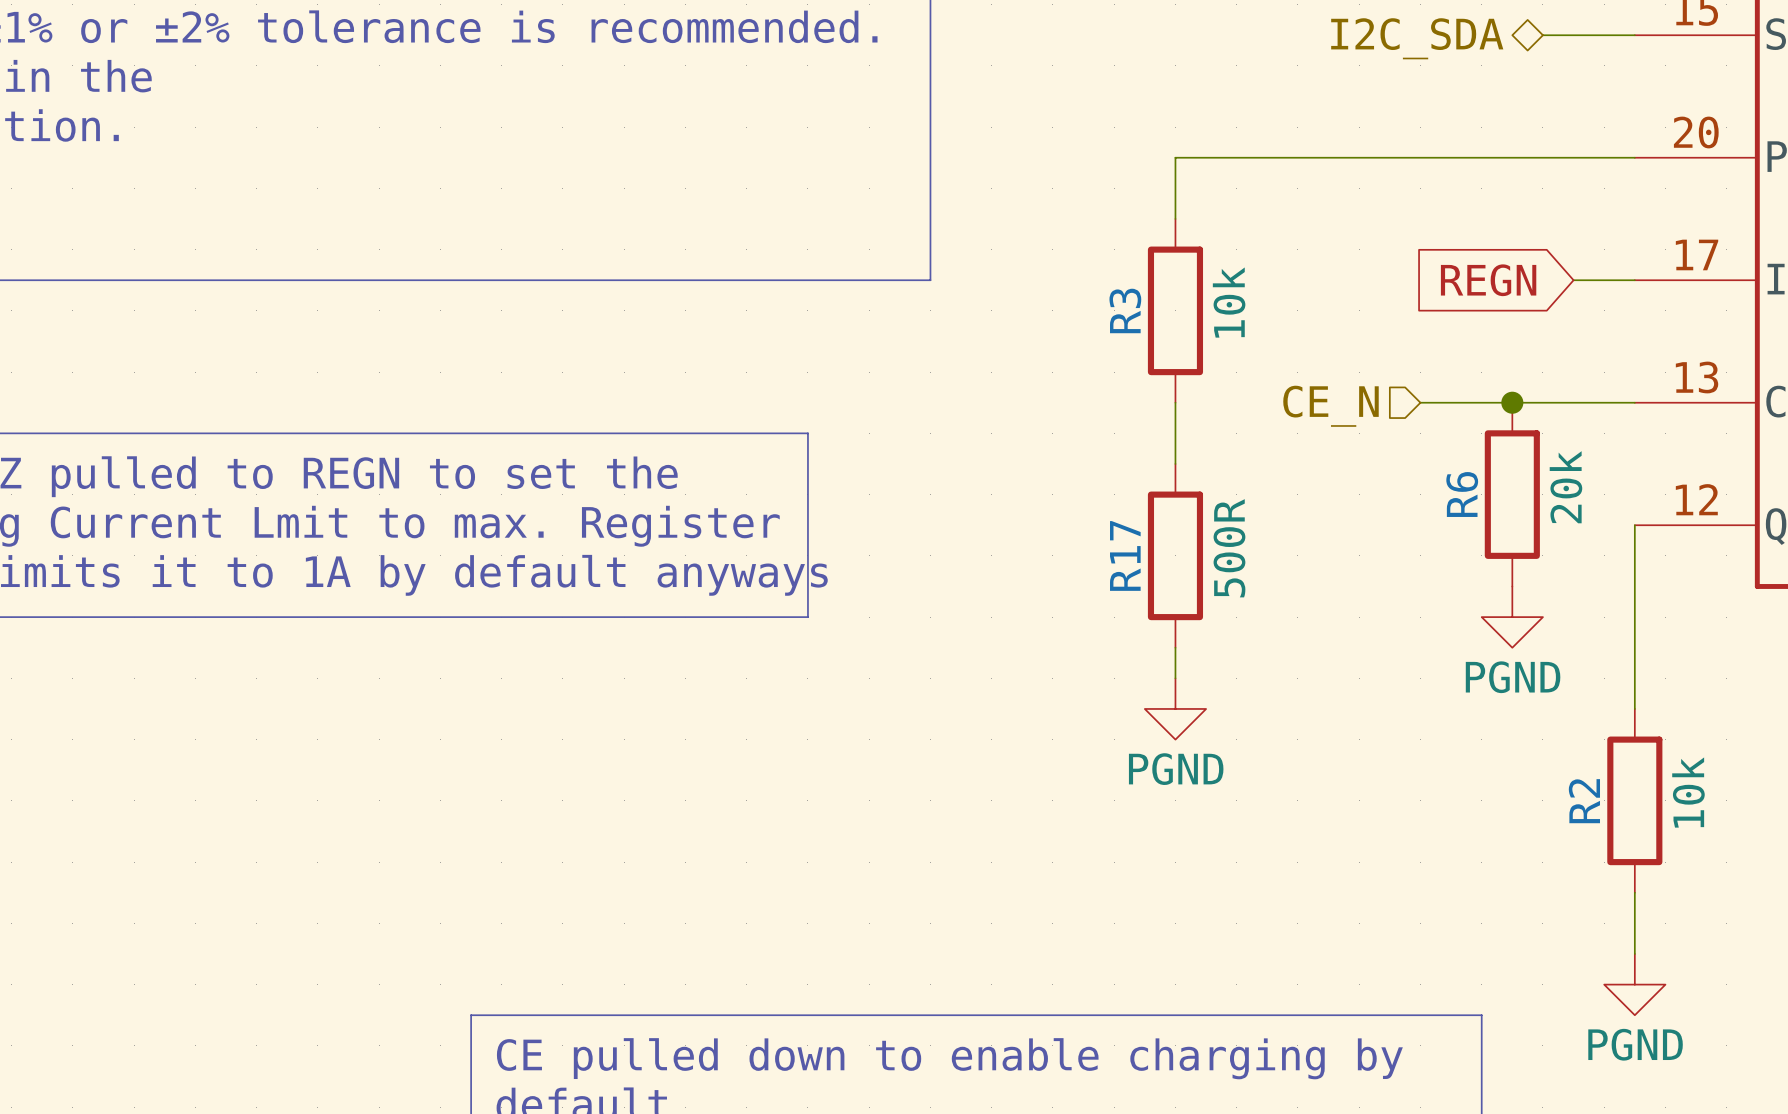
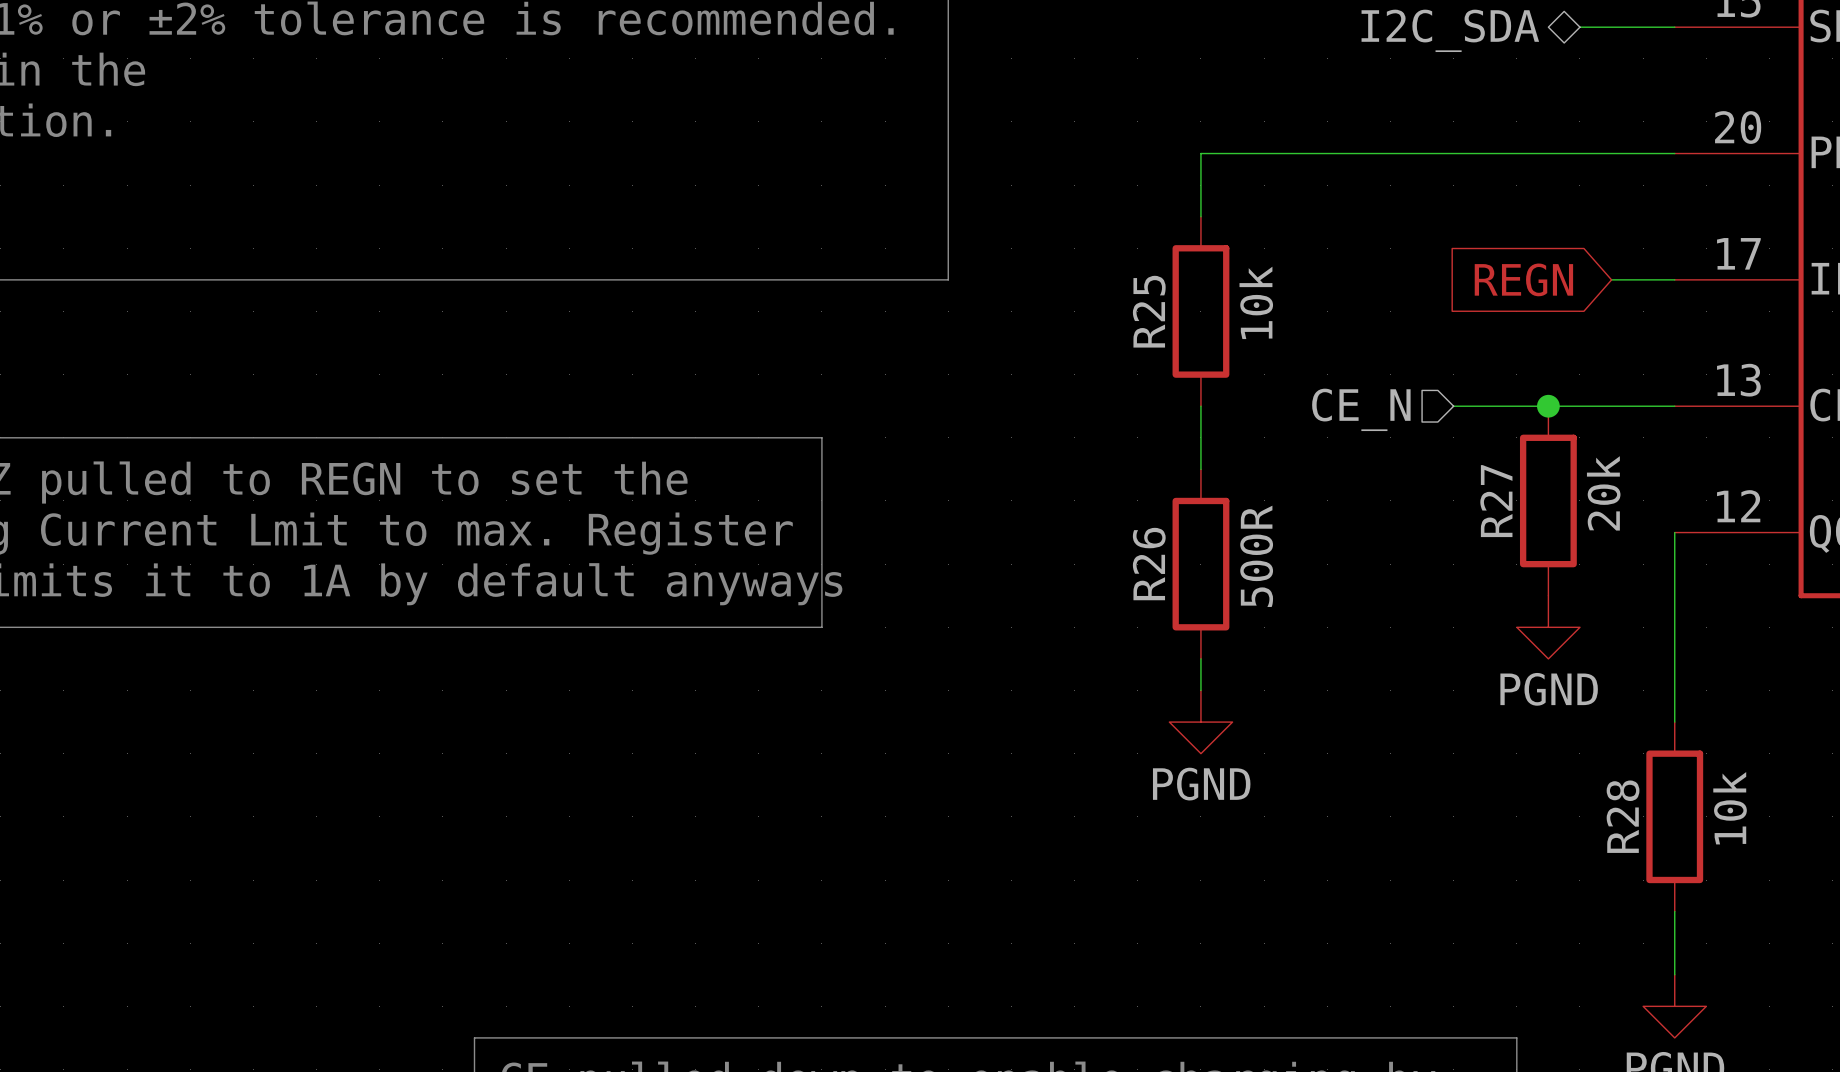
R3 name: R3 (1125, 310) -> R25 (1149, 311)
R6 name: R6 (1462, 494) -> R27 (1496, 501)
R17 name: R17 (1125, 555) -> R26 (1149, 564)
R2 name: R2 (1584, 801) -> R28 (1623, 816)

